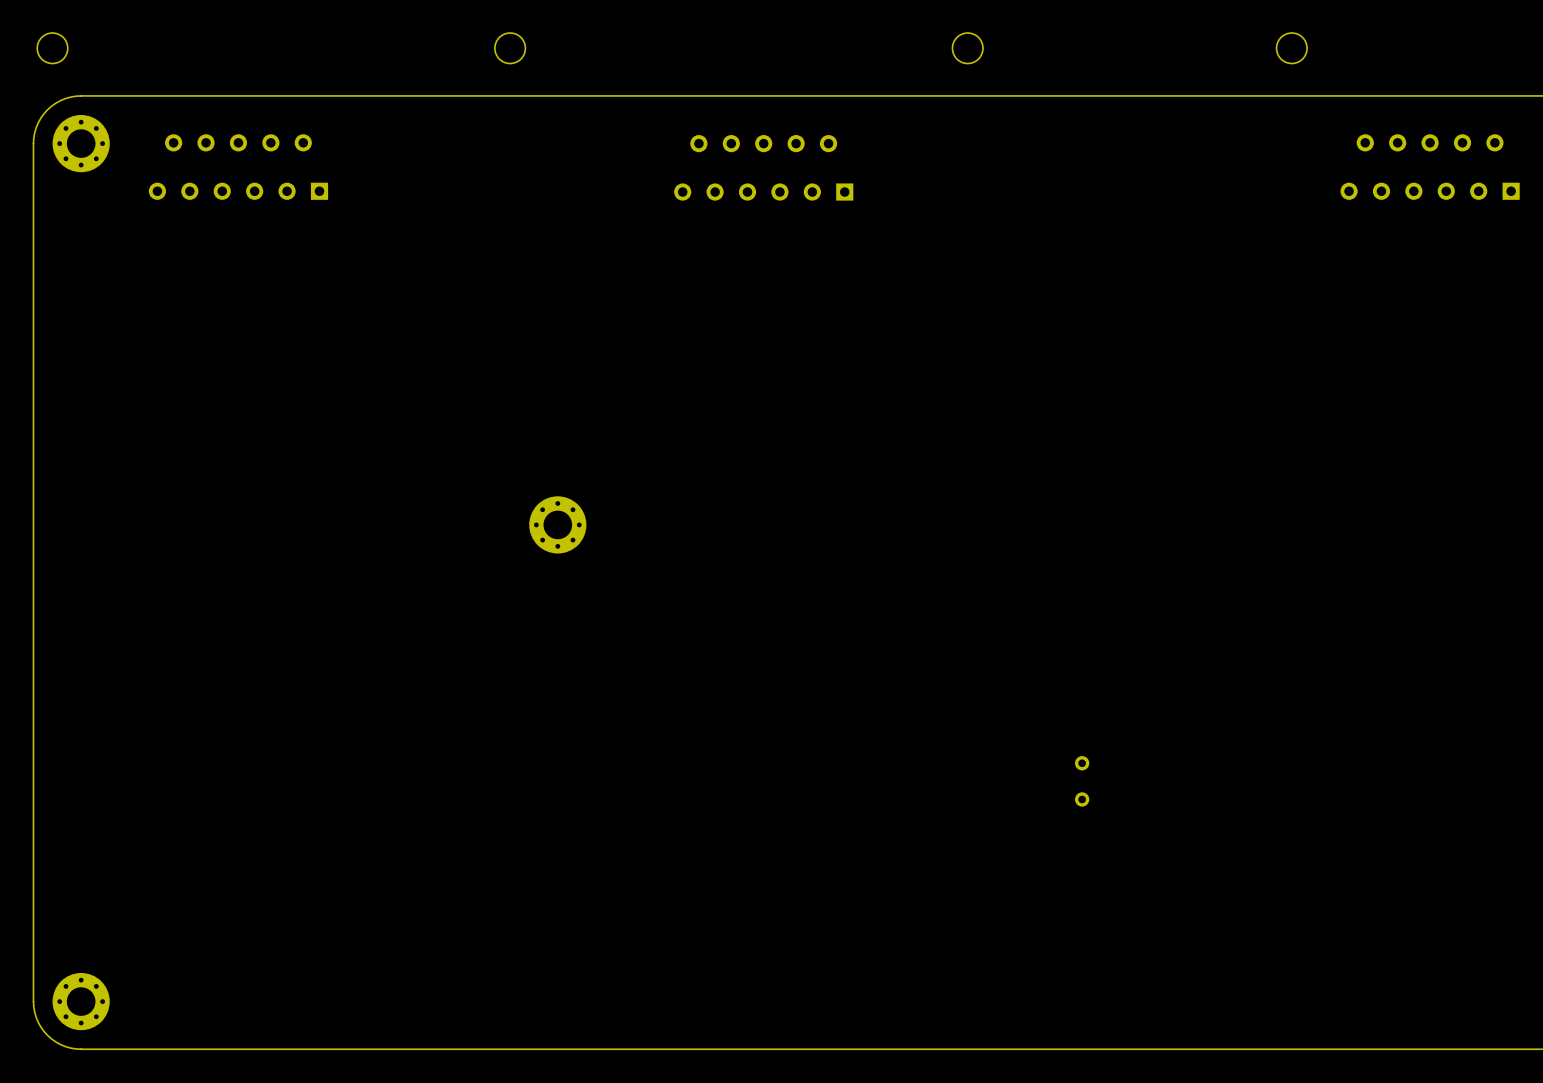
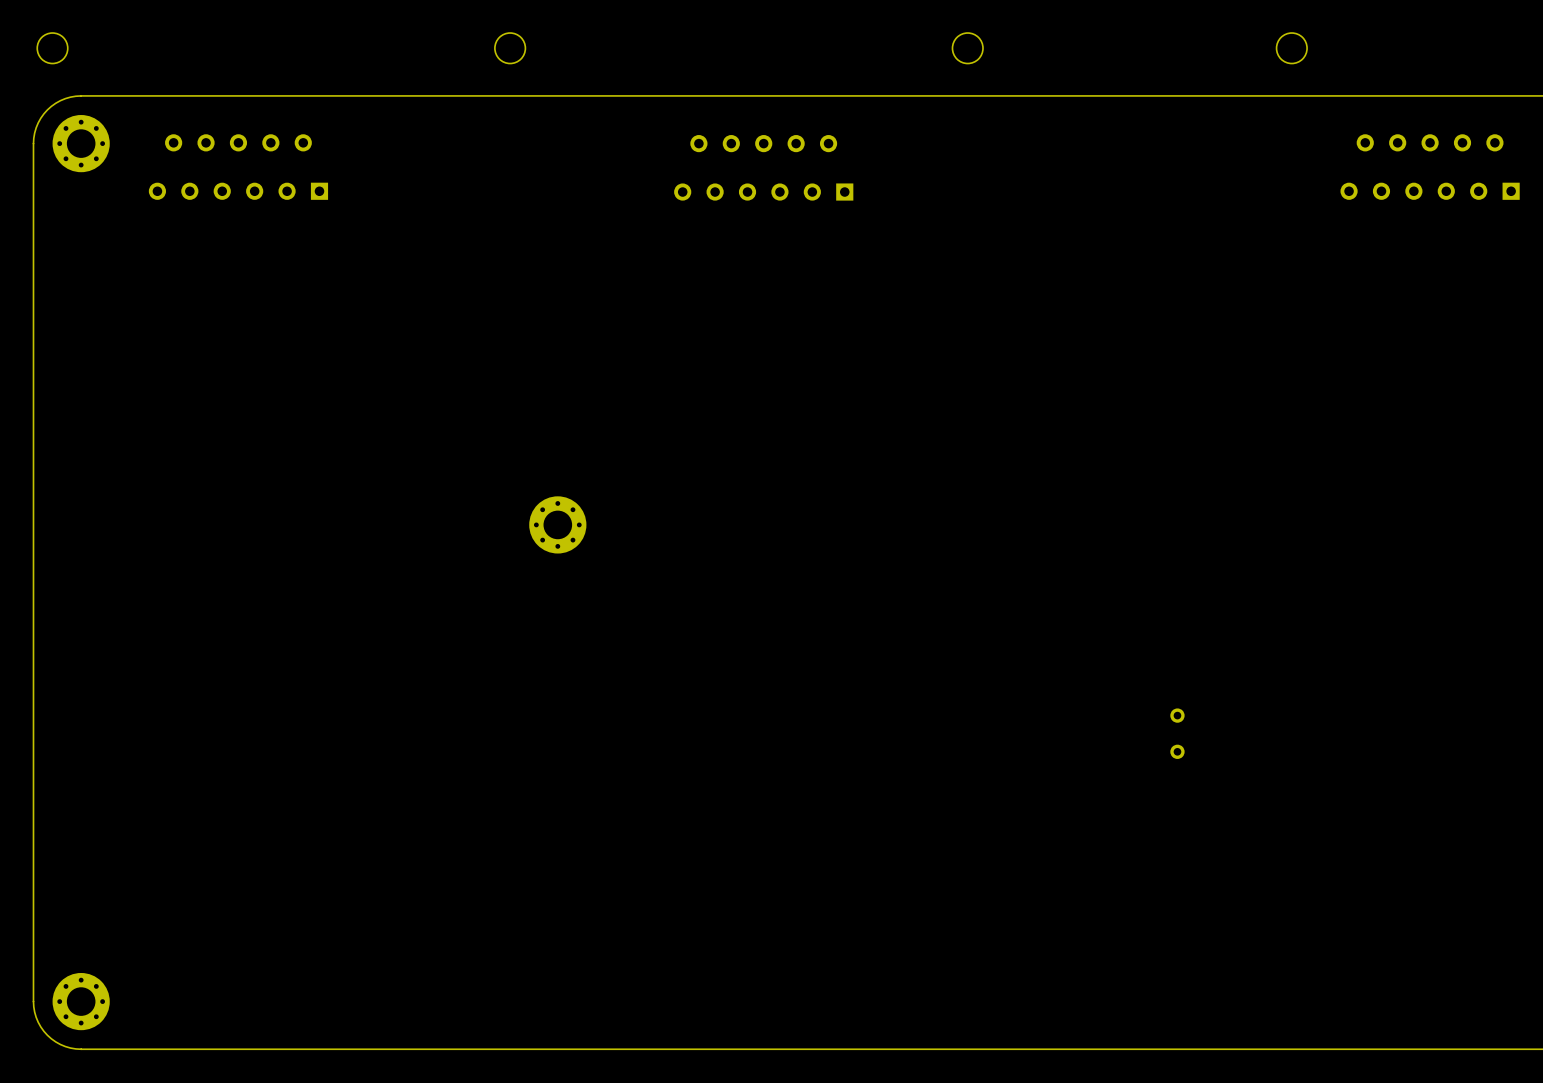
part position: (1082, 781) -> (1177, 733)

